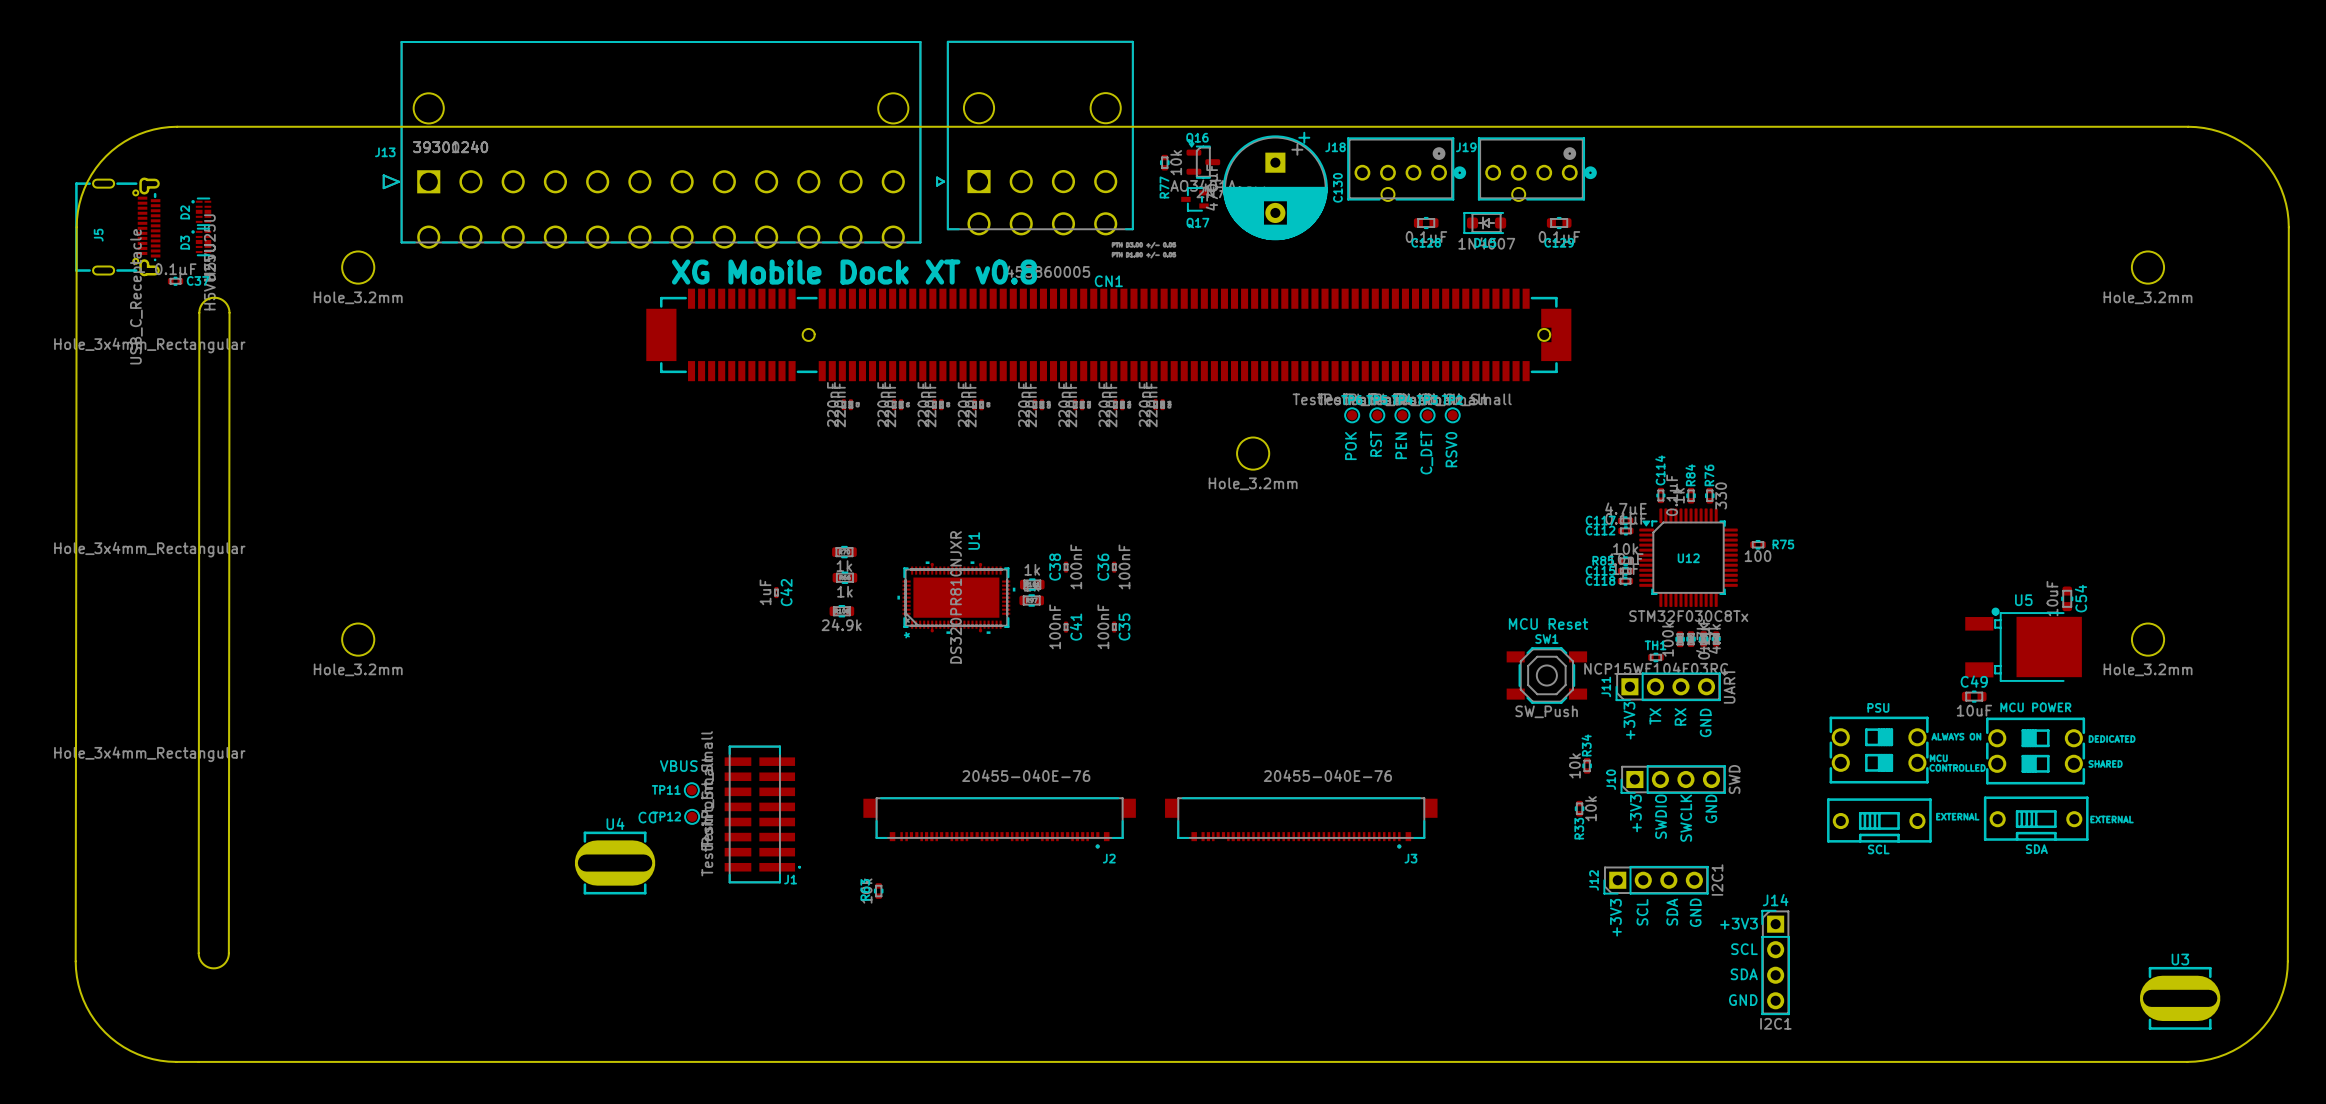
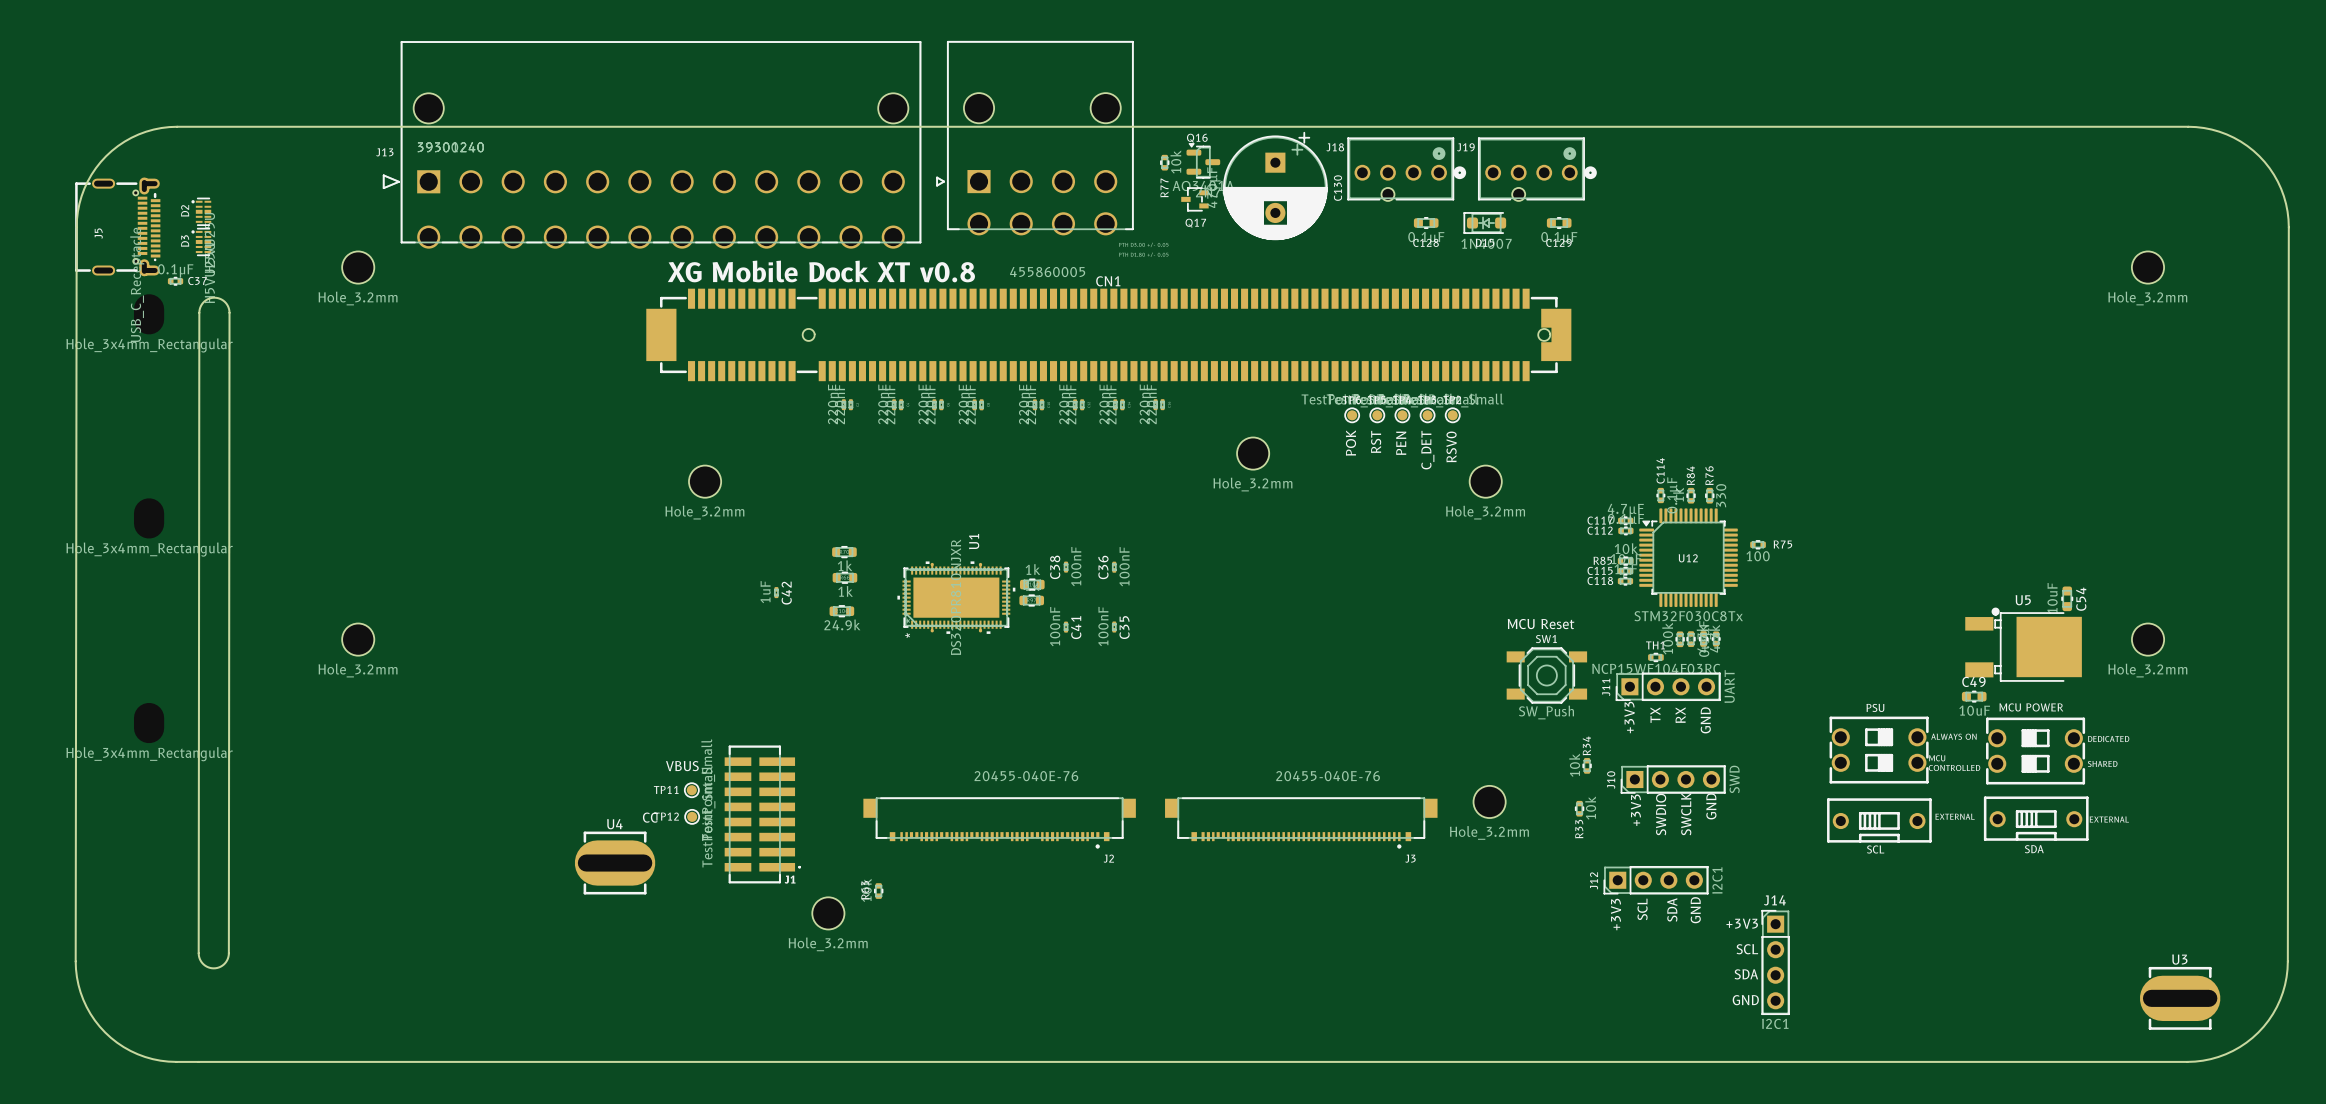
part: none -> Hole_3.2mm (705, 481)
part: none -> Hole_3.2mm (1485, 481)
part: none -> Hole_3.2mm (1489, 801)
part: none -> Hole_3.2mm (828, 913)

